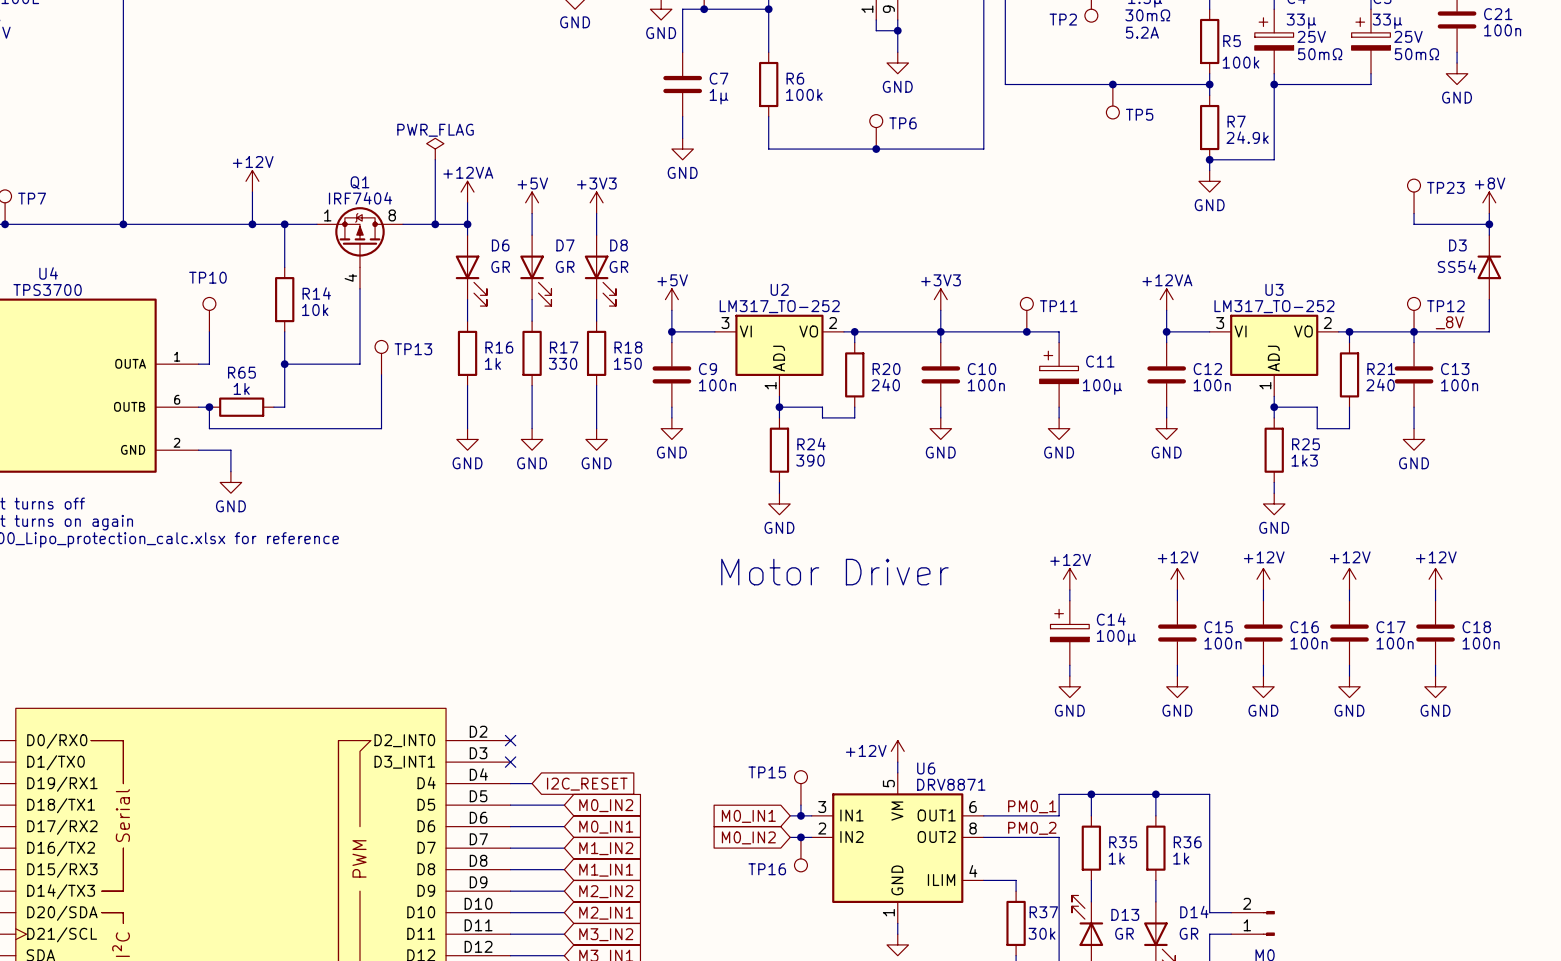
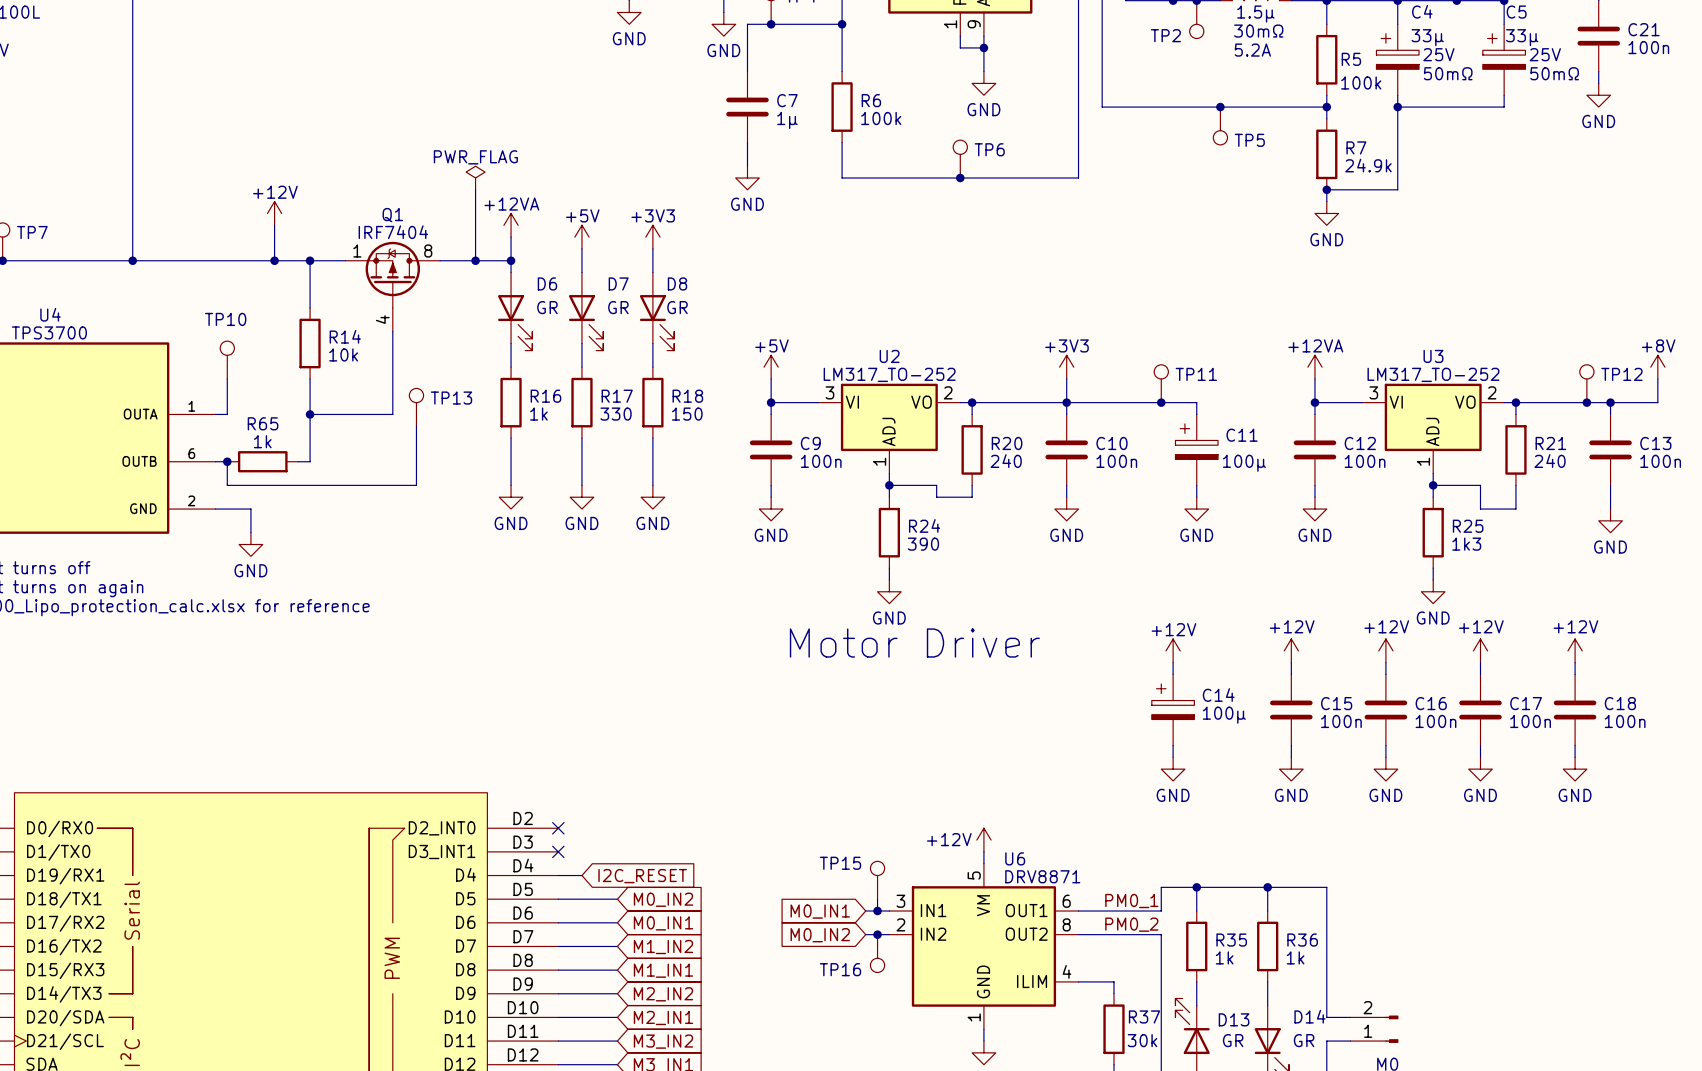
TP23: (1414, 196) -> none
power symbol position: +8V (1489, 202) -> +8V (1657, 367)
wire: (1414, 213) (1414, 224) (1489, 224) -> none
wire: (1489, 213) (1489, 235) -> none
junction: (1489, 224) -> none
D3: SS54 (1489, 267) -> none
power symbol position: +5V (671, 299) -> +5V (771, 367)
power symbol position: +3V3 (940, 299) -> +3V3 (1066, 367)
power symbol position: +12VA (1166, 299) -> +12VA (1314, 367)
wire: (1489, 299) (1489, 331) (1338, 331) -> none
wire: (671, 310) (671, 342) -> (771, 378) (771, 414)
wire: (940, 310) (940, 342) -> (1066, 378) (1066, 414)
wire: (1166, 310) (1166, 342) -> (1314, 378) (1314, 414)
TP11 position: (1026, 314) -> (1161, 383)
TP12 position: (1414, 314) -> (1586, 383)
label: _8V (1449, 322) -> none
wire: (671, 331) (714, 331) -> (771, 402) (818, 402)
junction position: (671, 331) -> (771, 402)
wire: (843, 331) (1059, 331) (1059, 342) -> (960, 402) (1196, 402) (1196, 414)
junction: (854, 331) -> none
junction: (940, 331) -> none
junction: (1026, 331) -> none
wire: (1166, 331) (1209, 331) -> (1314, 402) (1362, 402)
junction position: (1166, 331) -> (1314, 402)
junction: (1349, 331) -> none
wire: (1414, 331) (1414, 342) -> (1610, 402) (1610, 414)
junction: (1414, 331) -> none
wire: none -> (1657, 378) (1657, 402) (1504, 402)
junction: none -> (972, 402)
junction: none -> (1066, 402)
junction: none -> (1161, 402)
junction: none -> (1515, 402)
junction: none -> (1586, 402)
junction: none -> (1610, 402)
U2 position: (779, 355) -> (889, 428)
U3 position: (1274, 355) -> (1433, 428)
C9 position: (671, 374) -> (771, 449)
R20 position: (854, 374) -> (972, 449)
C10 position: (940, 374) -> (1066, 449)
C11 position: (1059, 374) -> (1196, 449)
C12 position: (1166, 374) -> (1314, 449)
R21 position: (1349, 374) -> (1515, 449)
C13 position: (1414, 374) -> (1610, 449)
wire: (779, 396) (779, 417) -> (889, 473) (889, 497)
wire: (1274, 396) (1274, 417) -> (1433, 473) (1433, 497)
wire: (671, 407) (671, 417) -> (771, 485) (771, 497)
wire: (779, 407) (822, 407) (822, 417) (854, 417) (854, 407) -> (889, 485) (936, 485) (936, 497) (972, 497) (972, 485)
junction position: (779, 407) -> (889, 485)
wire: (940, 407) (940, 417) -> (1066, 485) (1066, 497)
wire: (1059, 407) (1059, 417) -> (1196, 485) (1196, 497)
wire: (1166, 407) (1166, 417) -> (1314, 485) (1314, 497)
wire: (1274, 407) (1317, 407) (1317, 428) -> (1433, 485) (1445, 485)
junction position: (1274, 407) -> (1433, 485)
wire: (1349, 407) (1349, 428) -> (1515, 485) (1515, 509) (1480, 509) (1480, 485)
wire: (1414, 407) (1414, 428) -> (1610, 485) (1610, 509)
power symbol position: GND (671, 428) -> GND (771, 509)
power symbol position: GND (940, 428) -> GND (1066, 509)
power symbol position: GND (1059, 428) -> GND (1196, 509)
power symbol position: GND (1166, 428) -> GND (1314, 509)
power symbol position: GND (1414, 439) -> GND (1610, 520)
R24 position: (779, 450) -> (889, 532)
R25 position: (1274, 450) -> (1433, 532)
wire: (779, 482) (779, 493) -> (889, 568) (889, 579)
wire: (1274, 482) (1274, 493) -> (1433, 568) (1433, 579)
power symbol position: GND (779, 503) -> GND (889, 591)
power symbol position: GND (1274, 503) -> GND (1433, 591)

